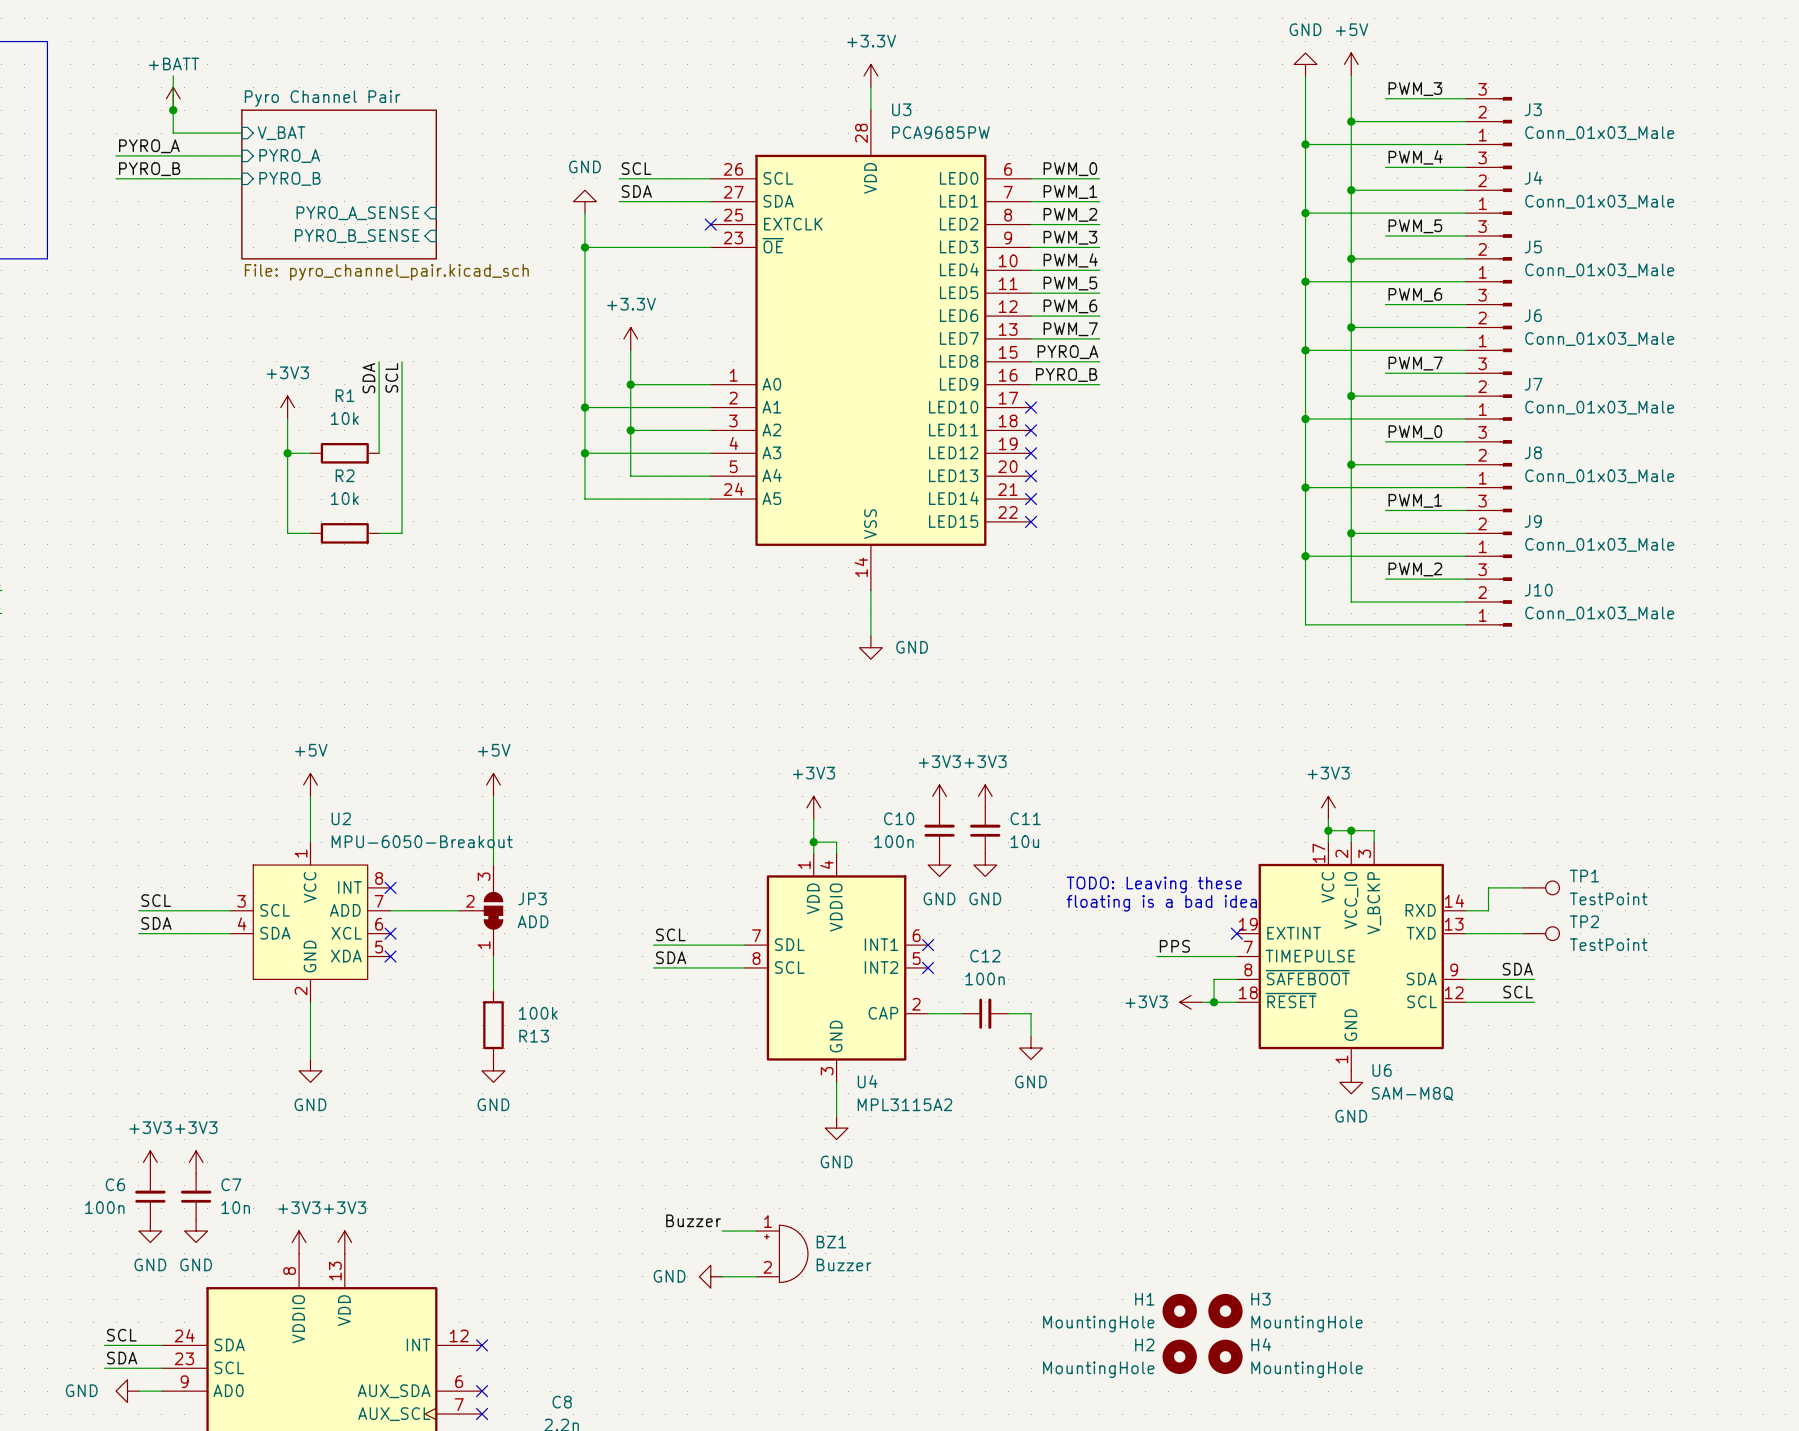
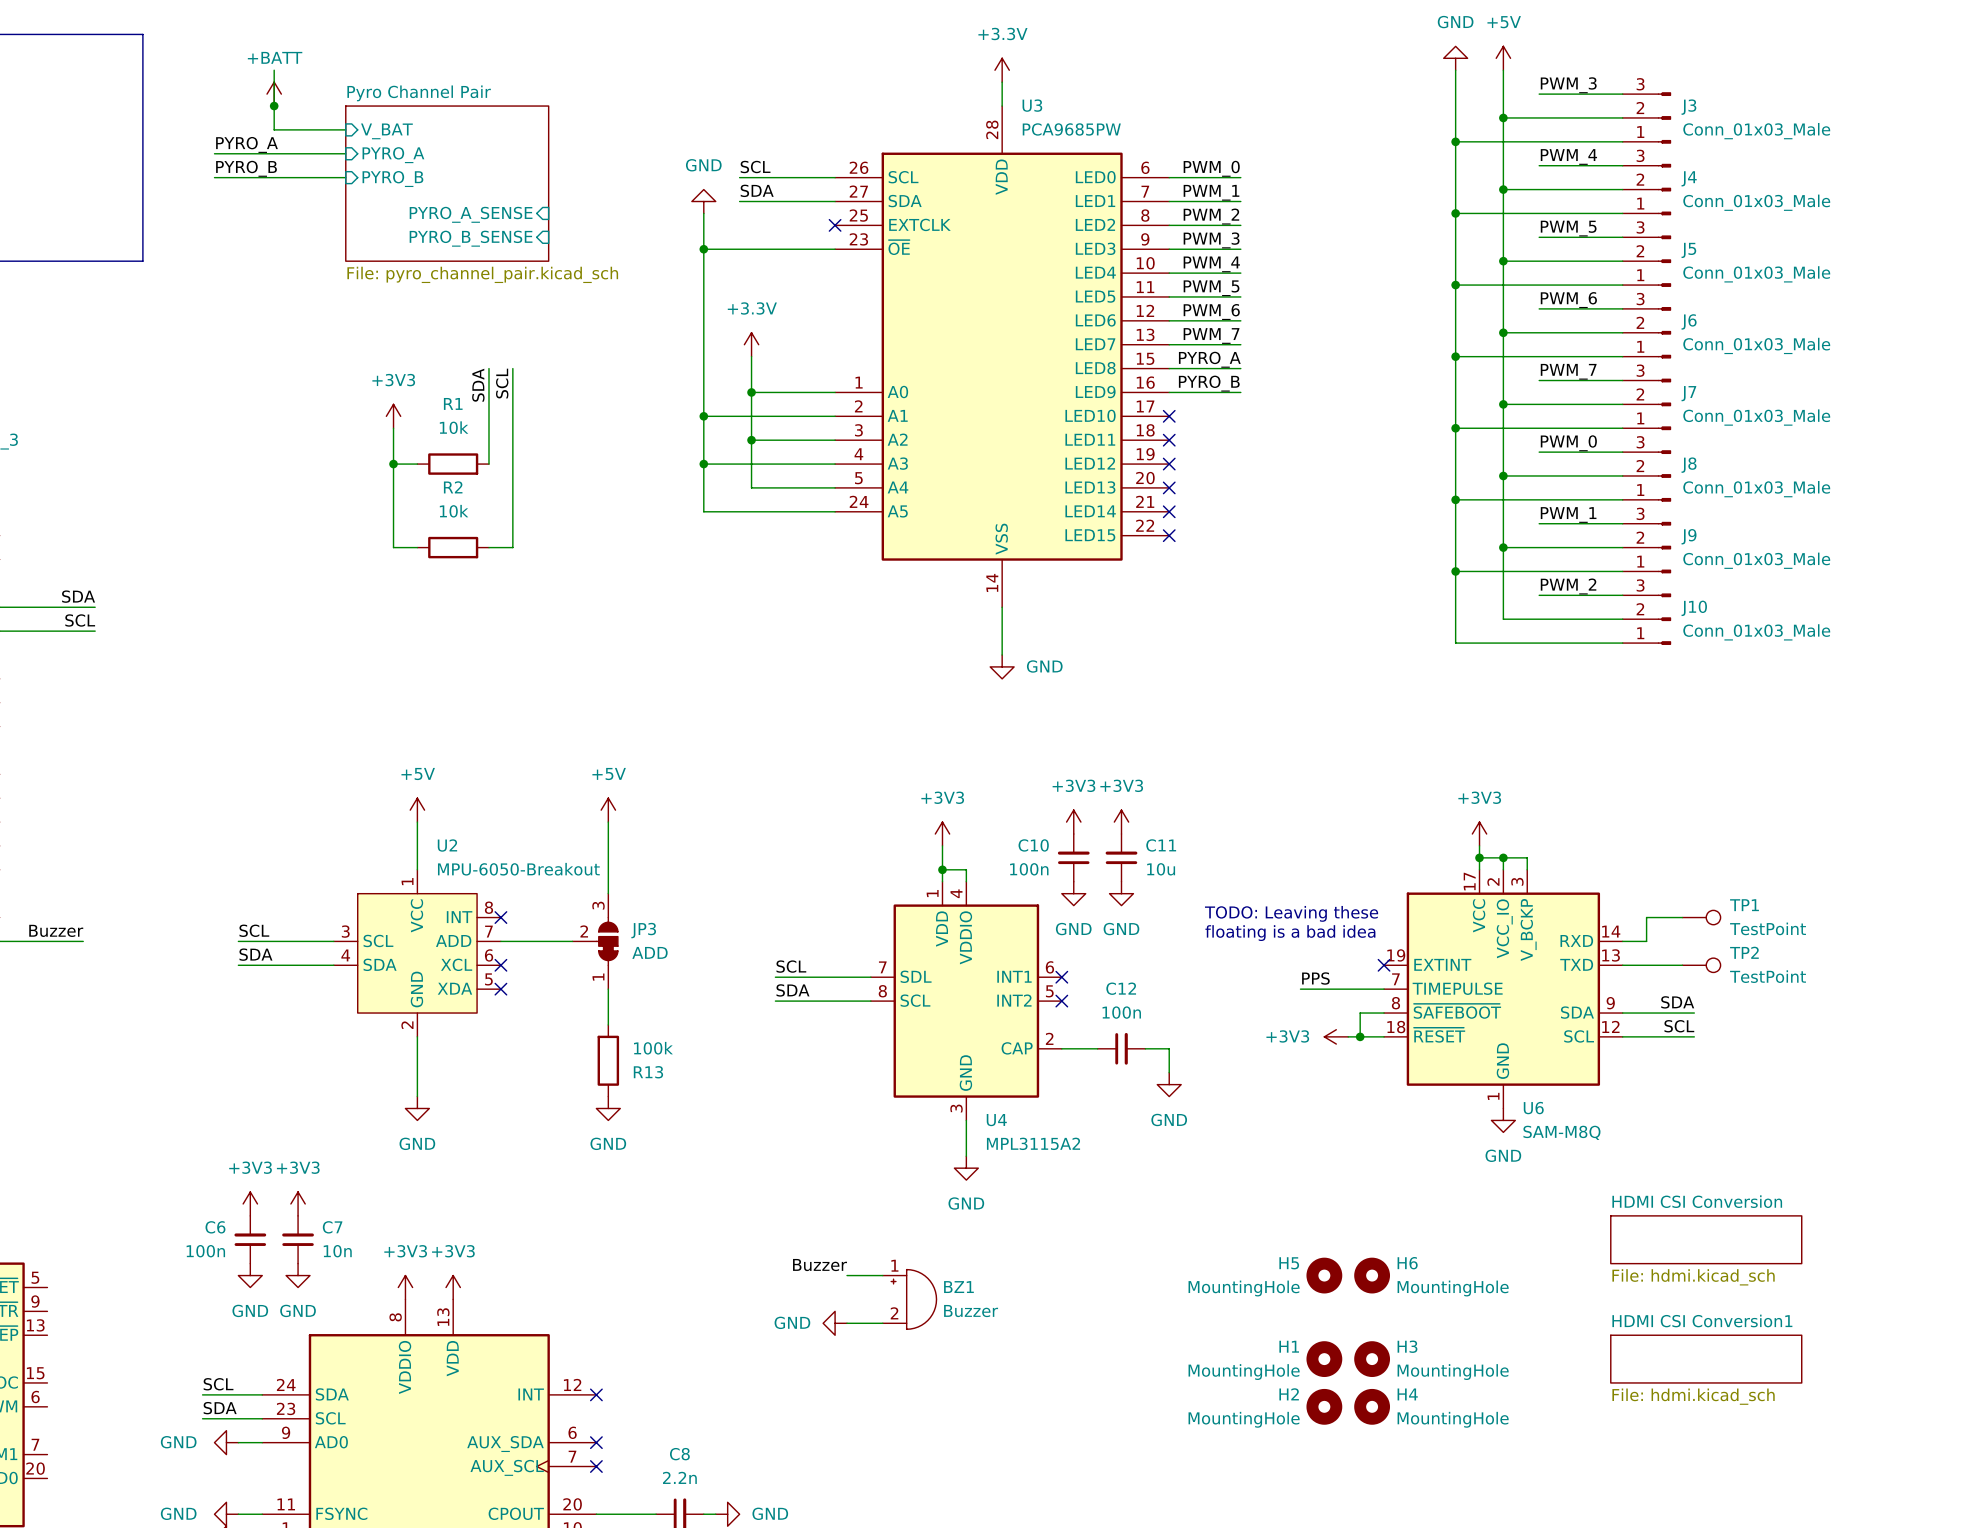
sheet HDMI CSI Conversion: none -> File: hdmi.kicad_sch (1706, 1239)
H5: none -> MountingHole (1324, 1275)
H6: none -> MountingHole (1372, 1275)
sheet HDMI CSI Conversion1: none -> File: hdmi.kicad_sch (1706, 1359)

